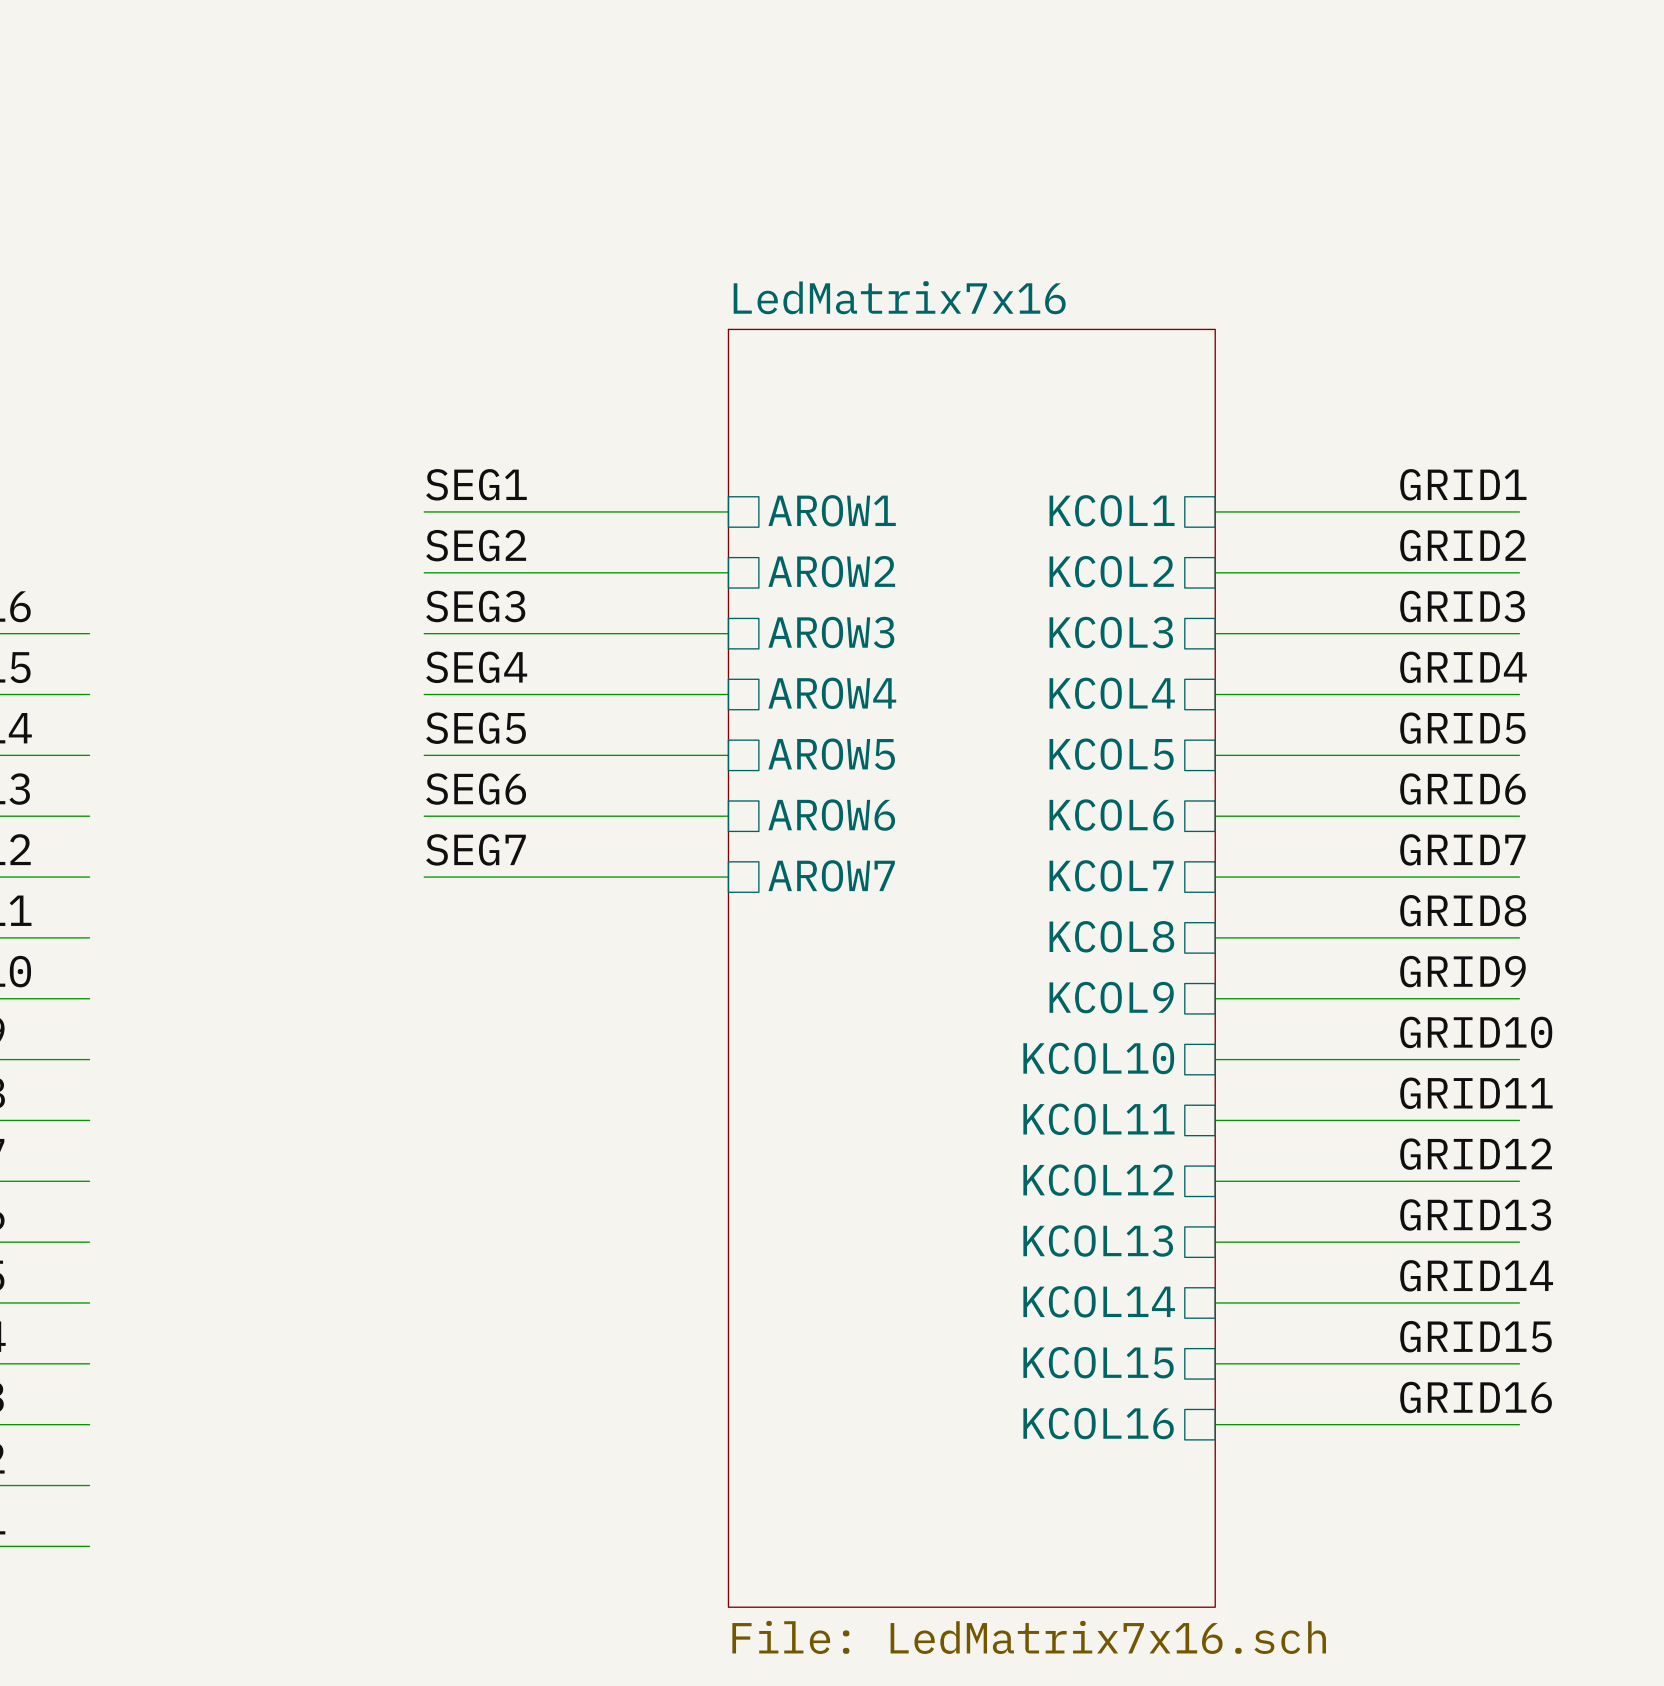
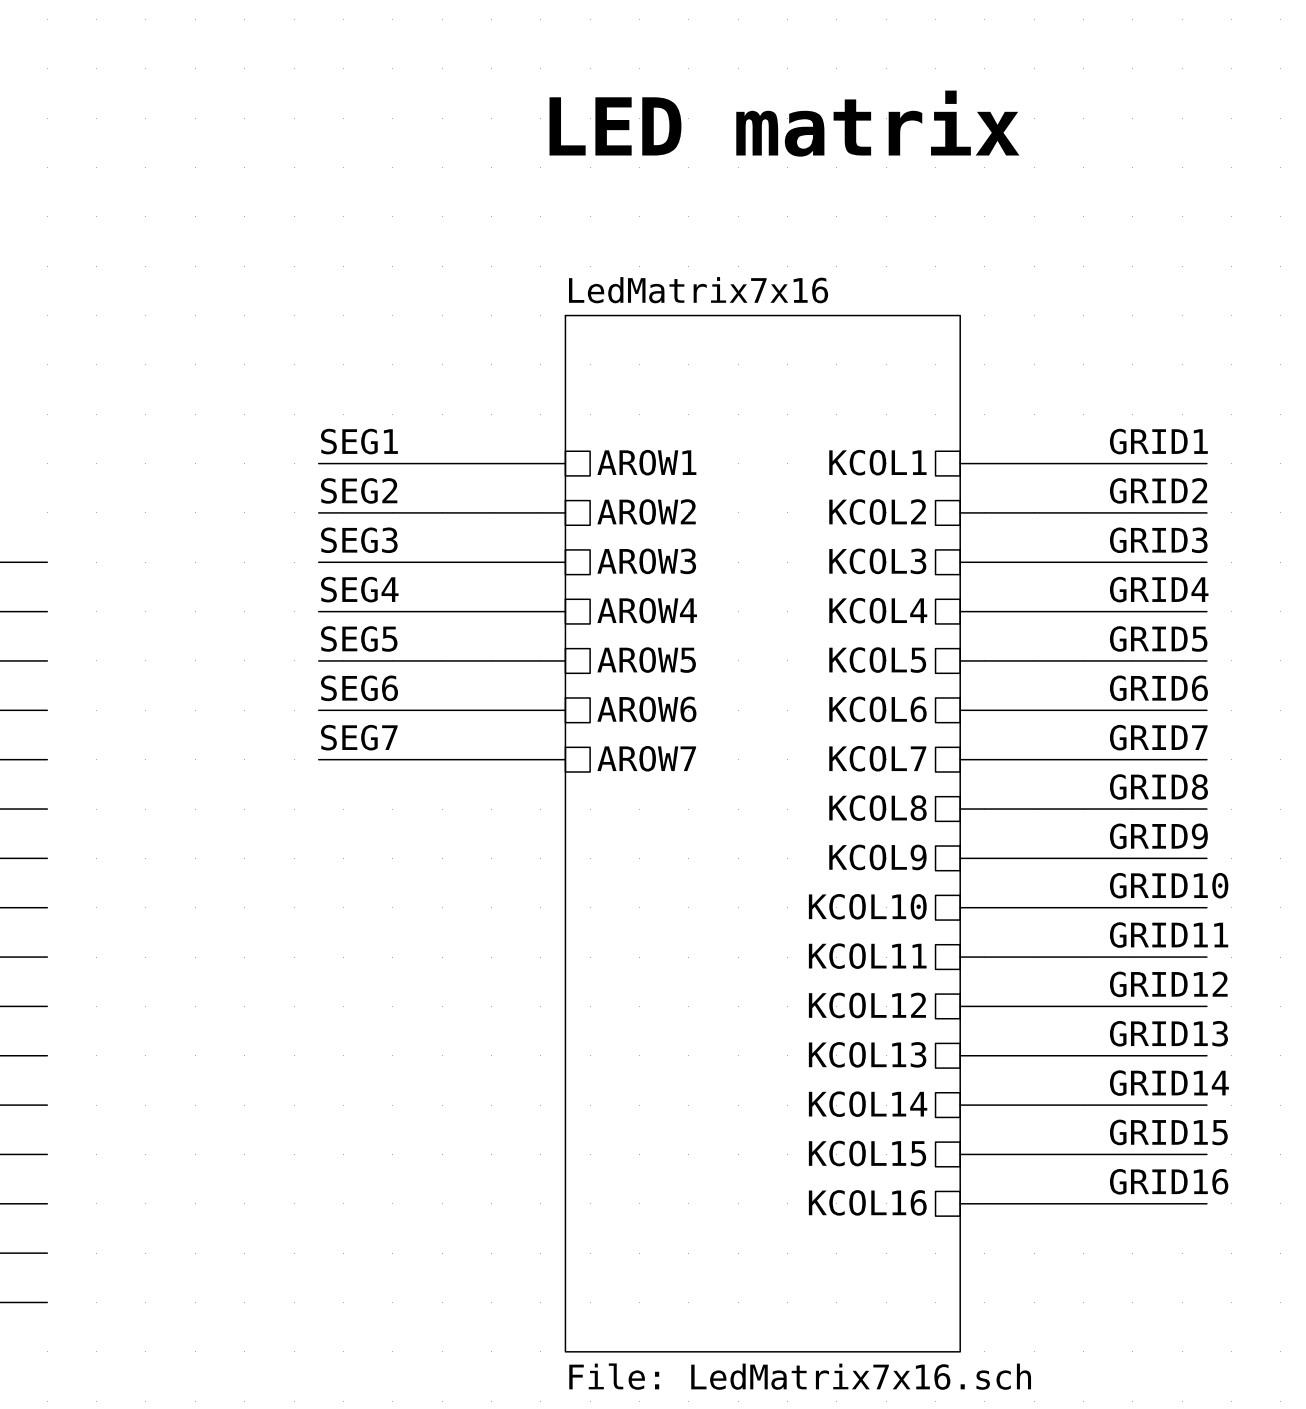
text: none -> LED matrix (784, 123)

